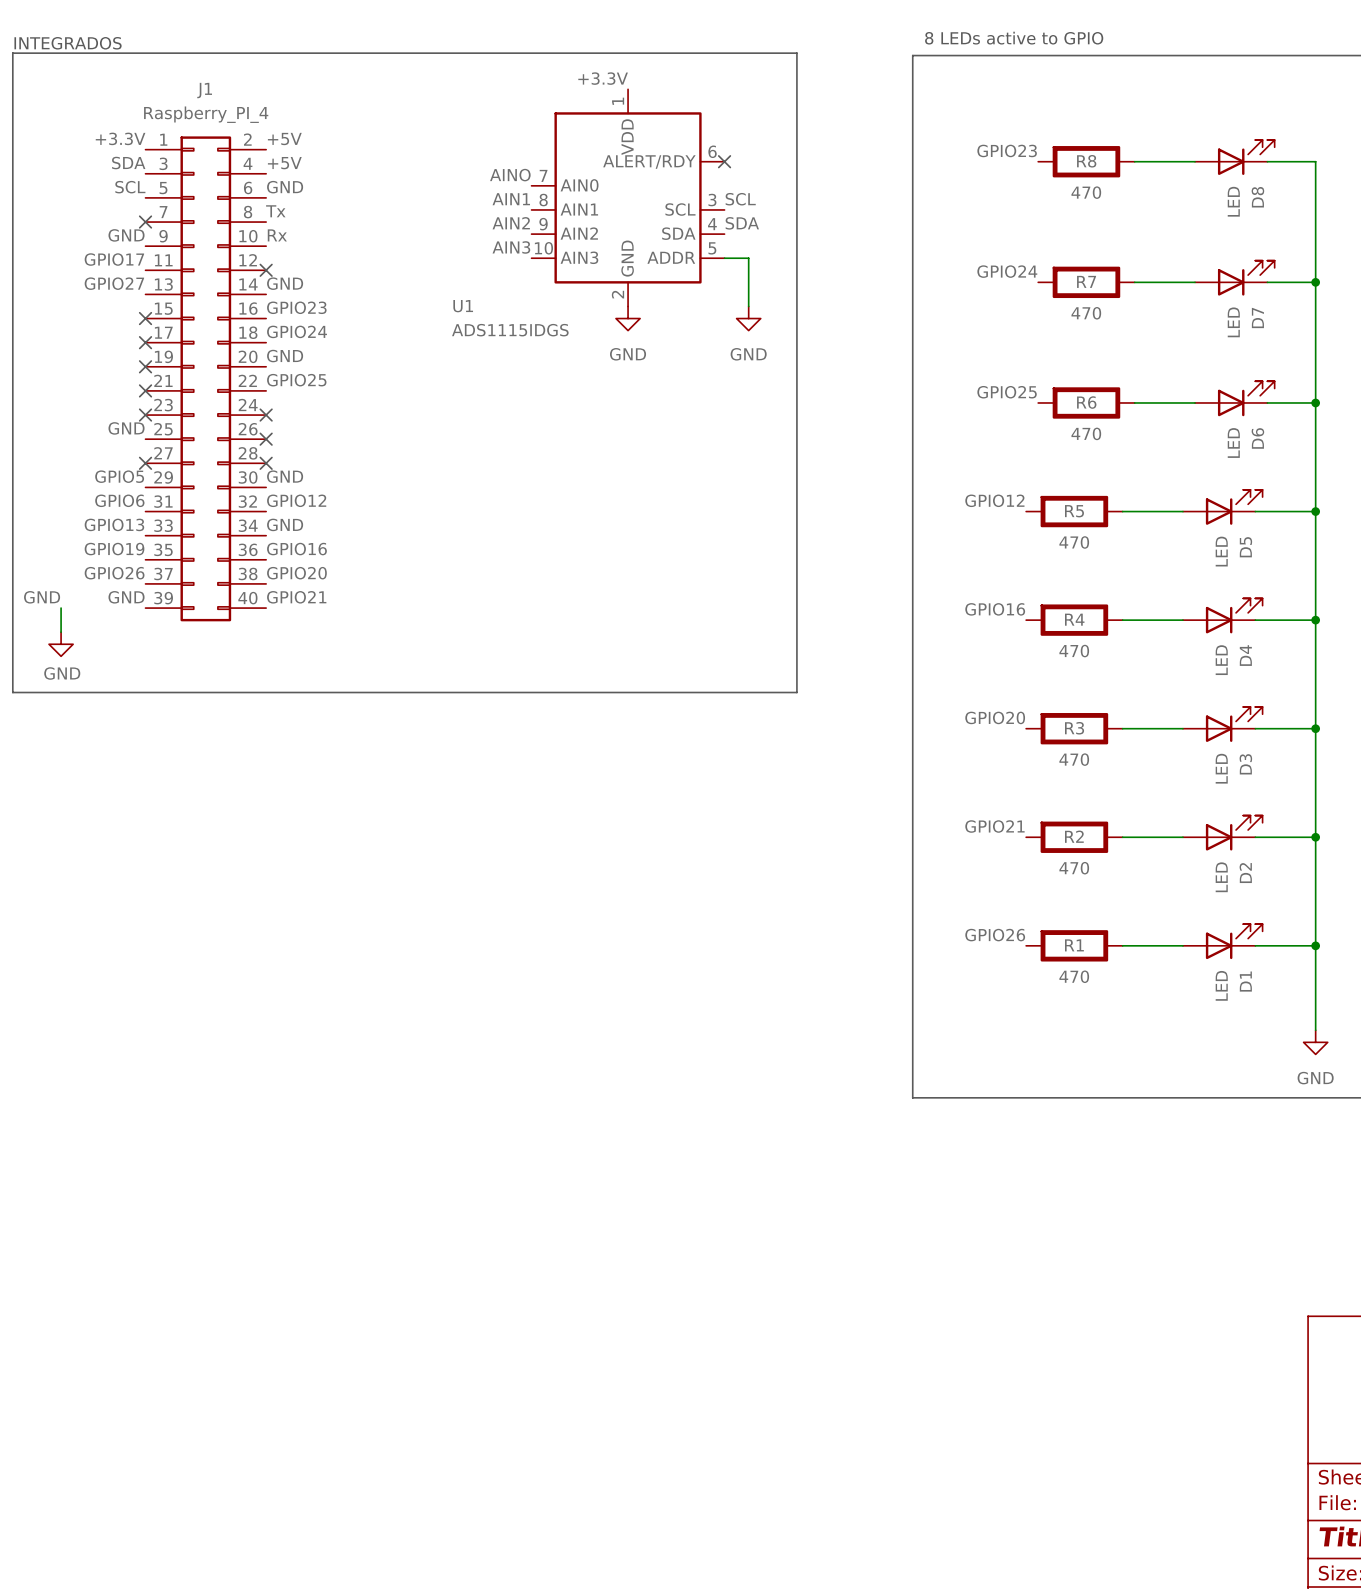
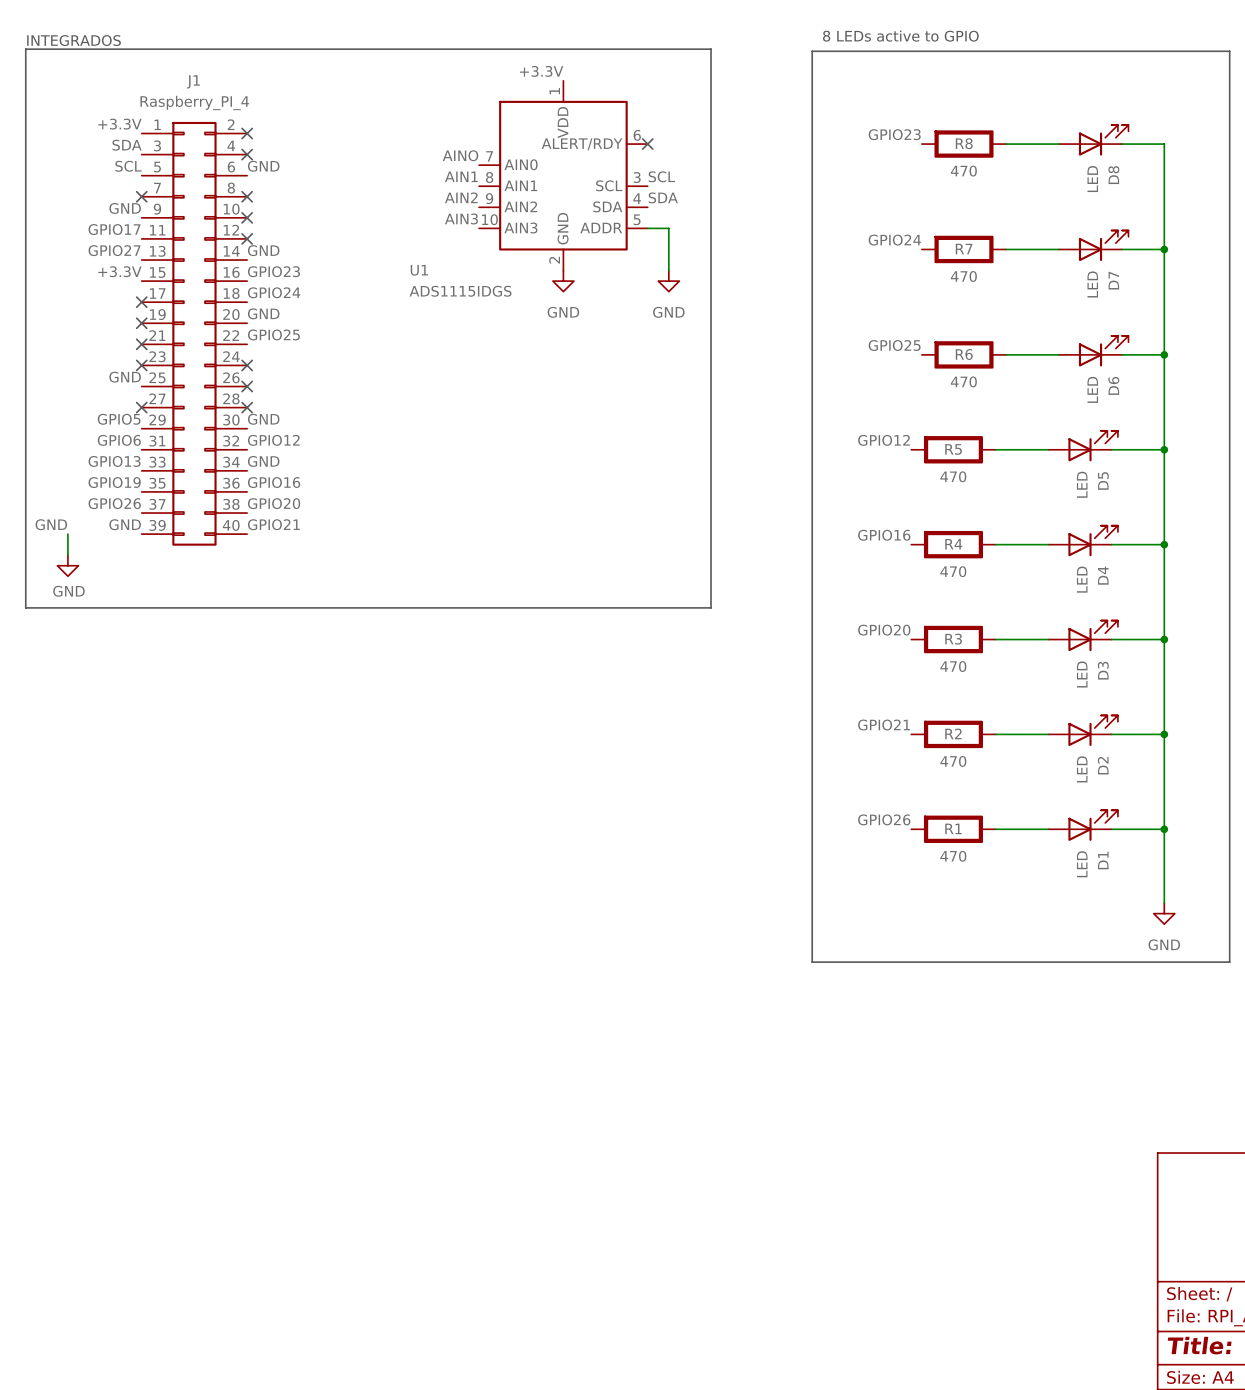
label: +5V (284, 139) -> none
no-connect mark: none -> (247, 133)
label: +5V (284, 163) -> none
no-connect mark: none -> (247, 154)
label: Tx (275, 211) -> none
no-connect mark: none -> (247, 196)
label: Rx (277, 235) -> none
no-connect mark: none -> (247, 217)
label: none -> +3.3V (119, 271)
no-connect mark: (145, 318) -> none

